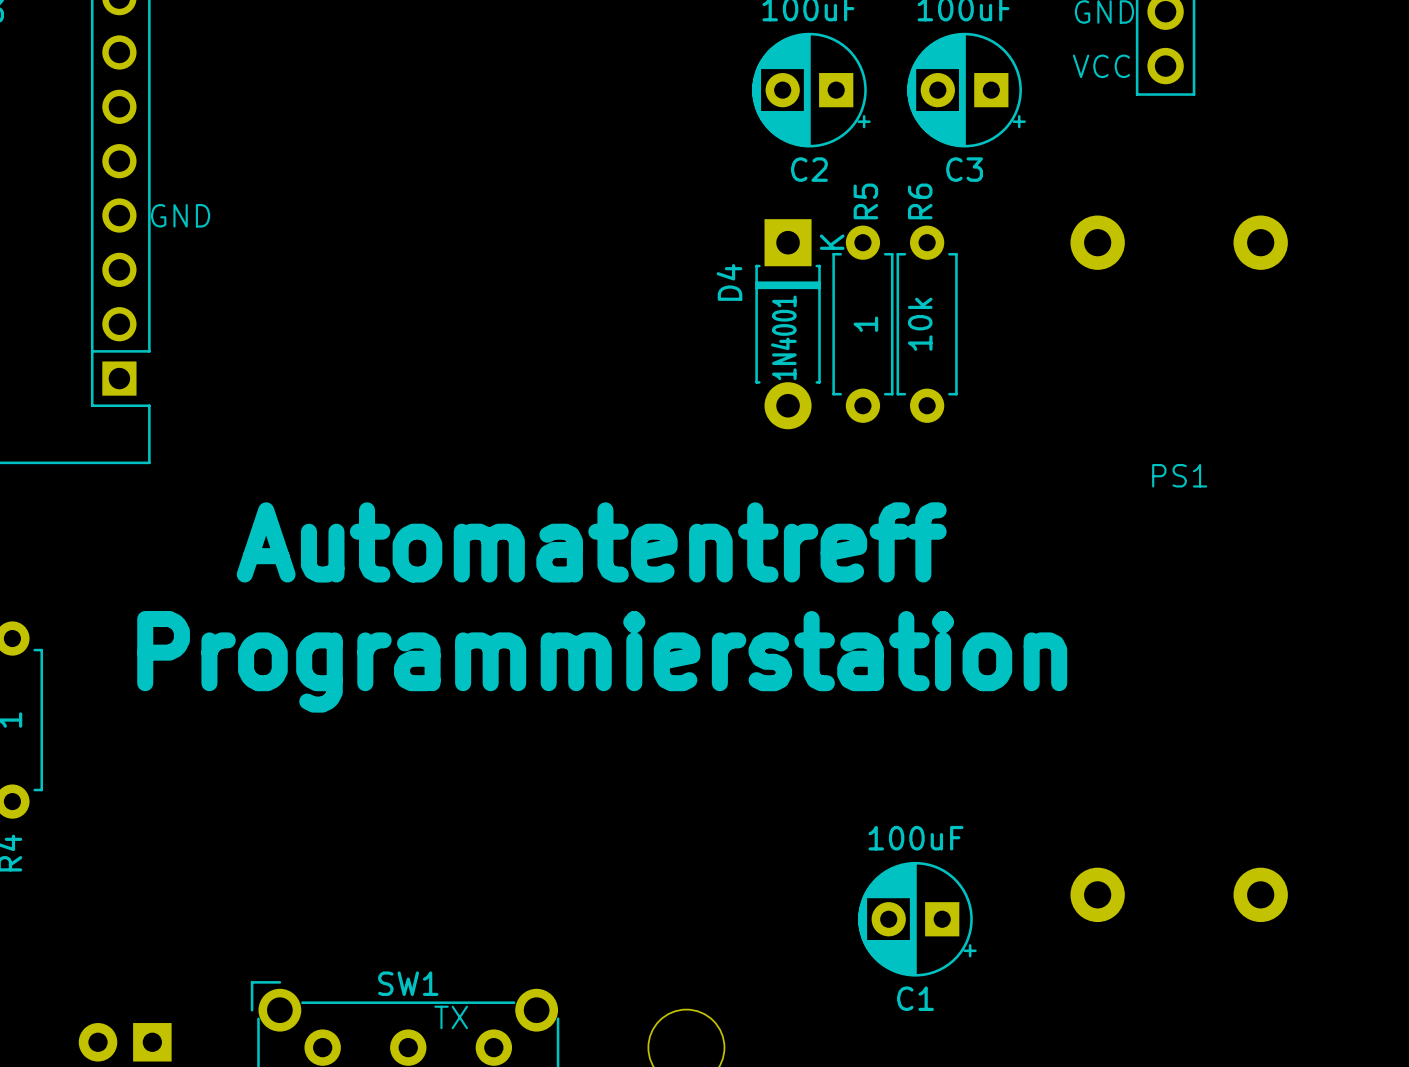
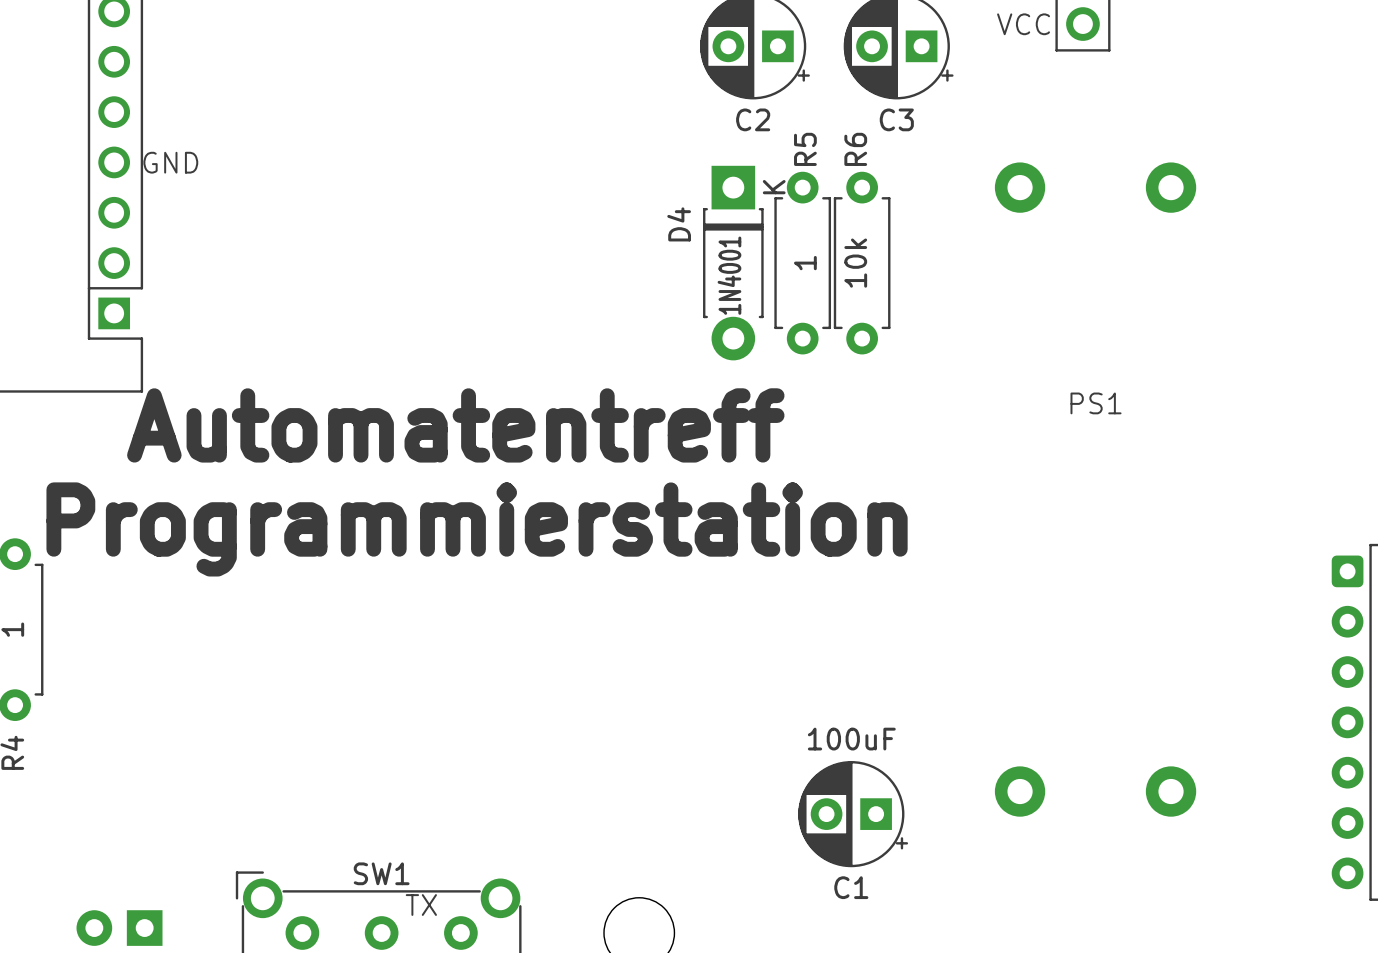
text position: Automatentreff (591, 542) -> Automatentreff (455, 425)
text position: Programmierstation (602, 661) -> Programmierstation (477, 529)

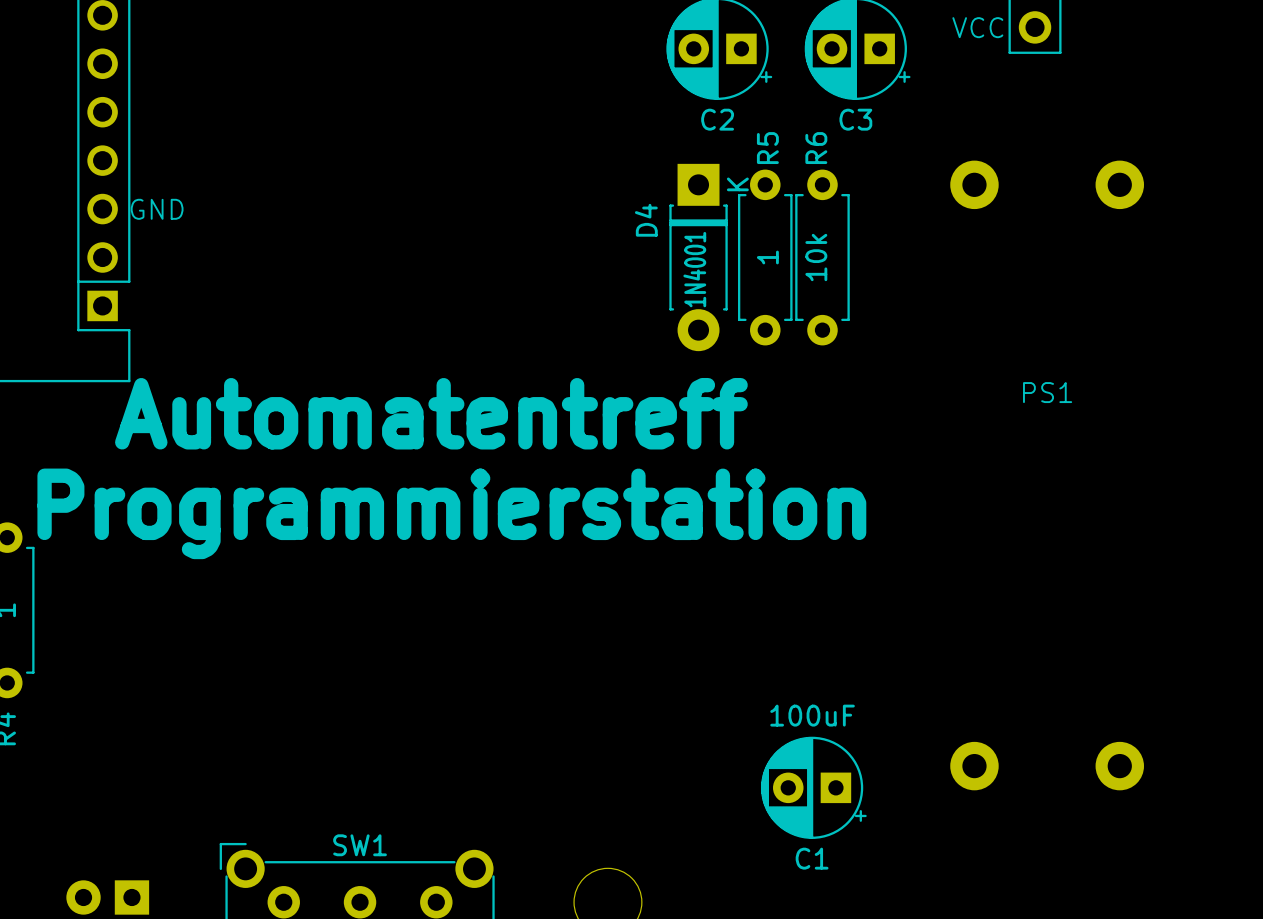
text position: GND (170, 162) -> GND (157, 209)
text: TX (421, 905) -> none

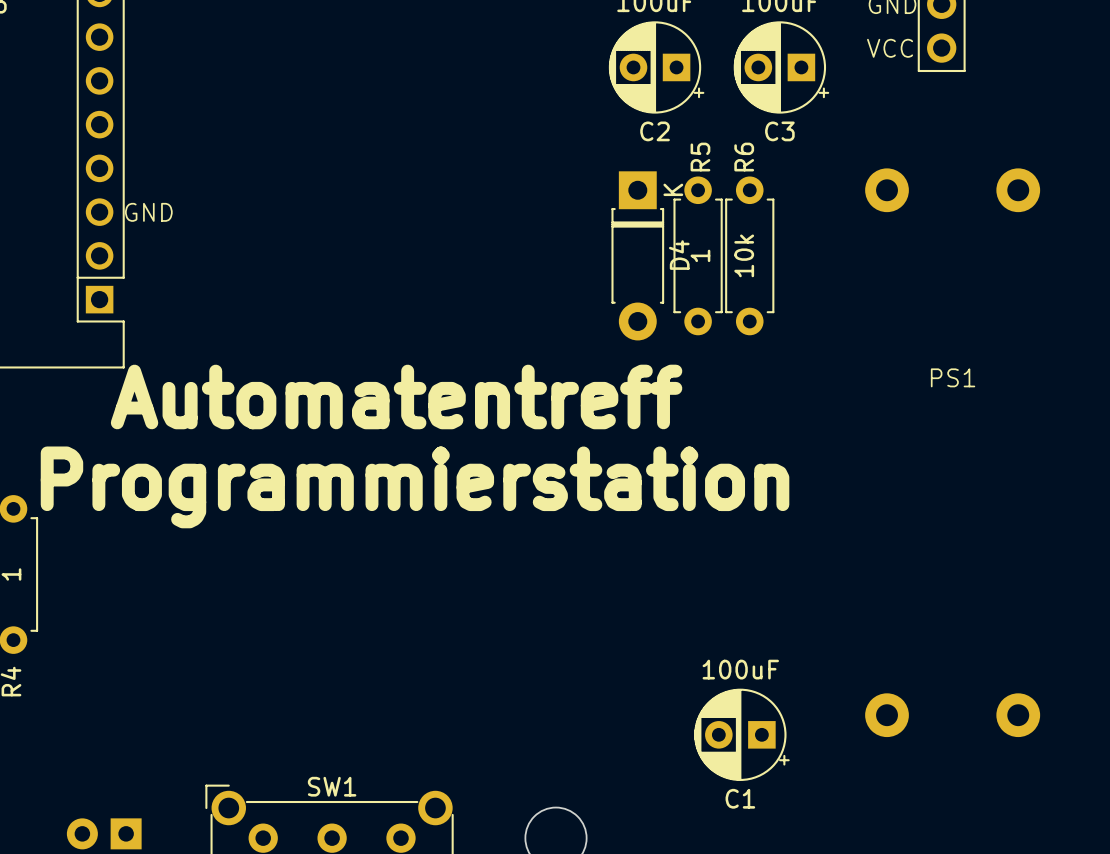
D4 name position: D4 (646, 220) -> D4 (679, 255)
D4 value: 1N4001 (694, 269) -> none

